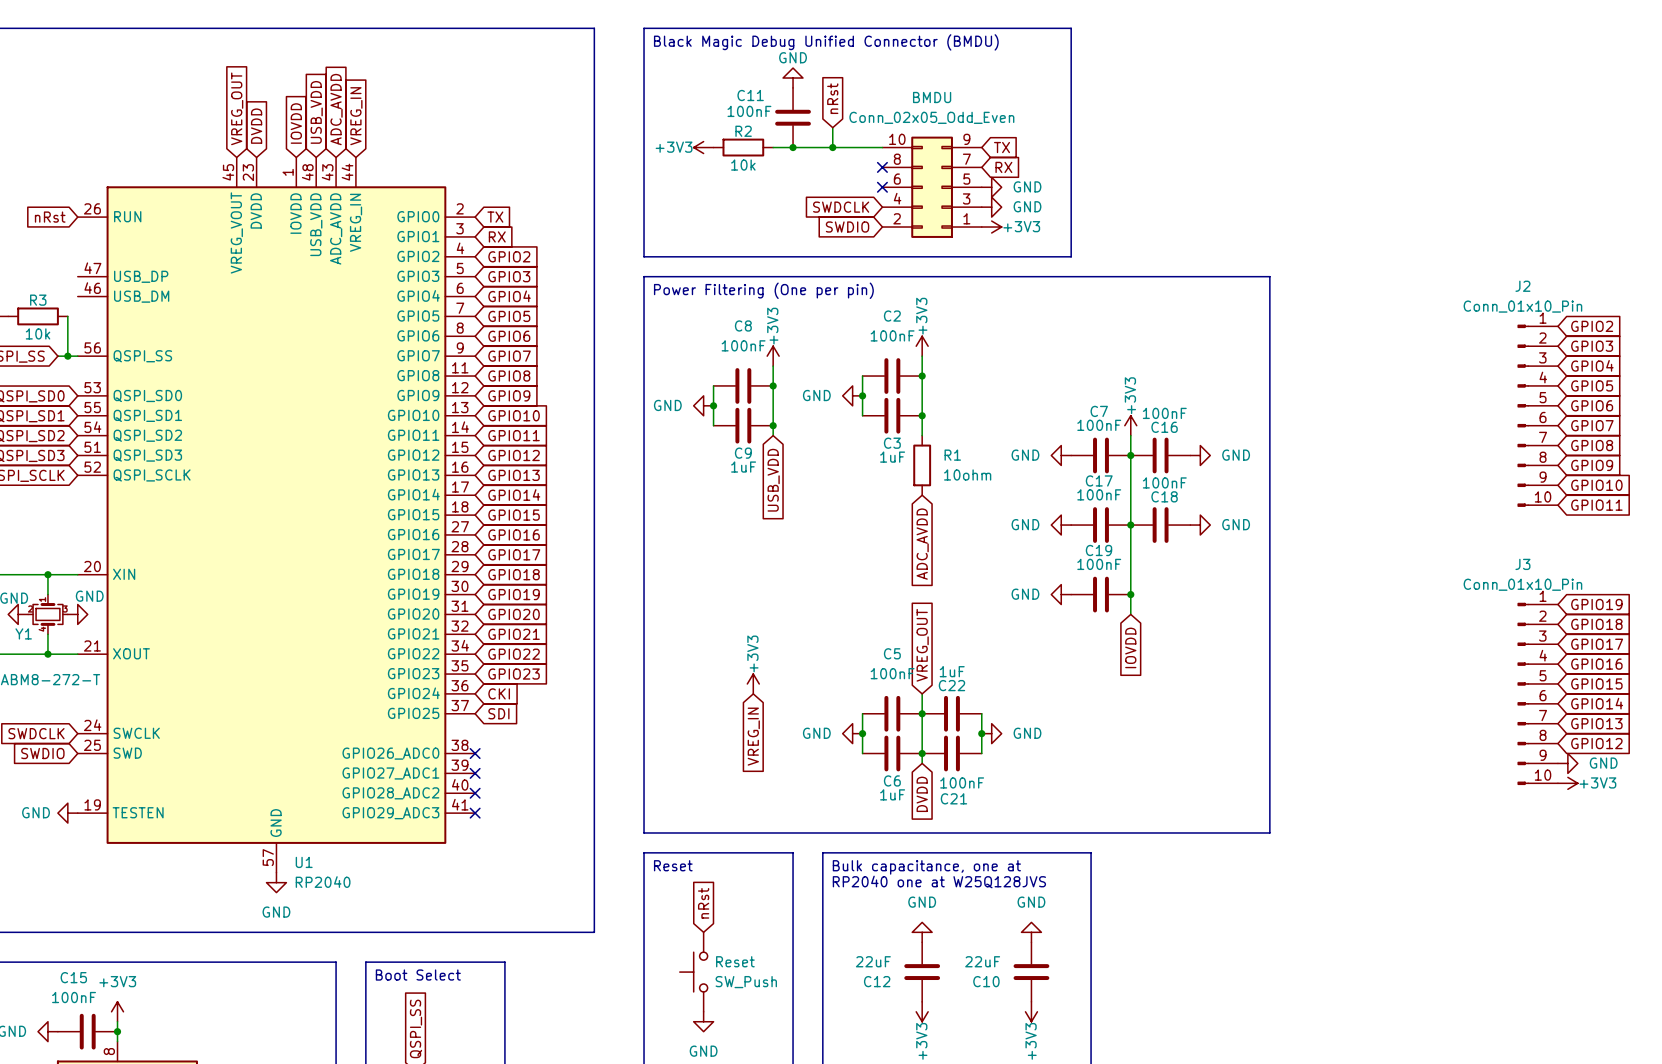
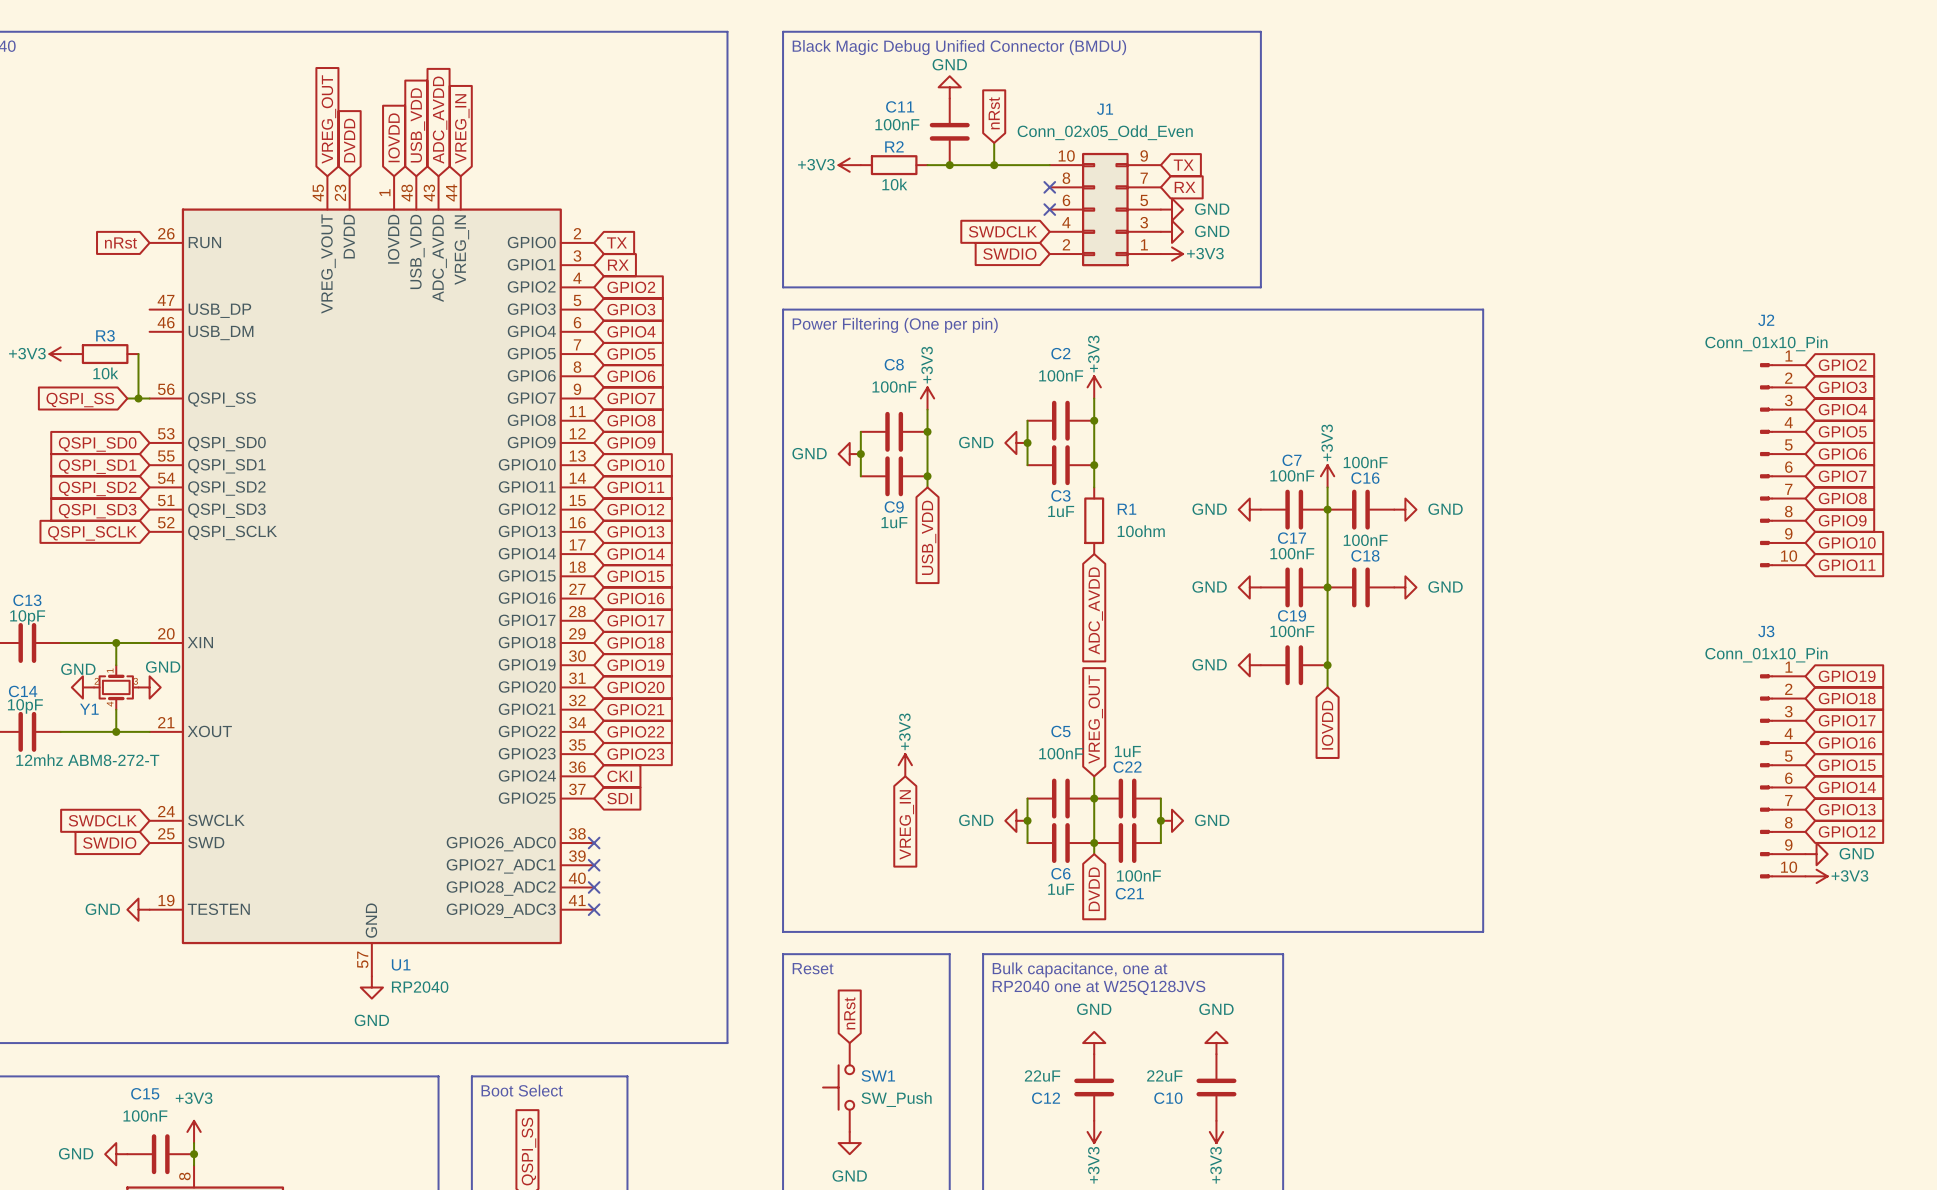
BMDU name: BMDU (932, 97) -> J1 (1105, 109)
Reset name: Reset (735, 961) -> SW1 (878, 1075)

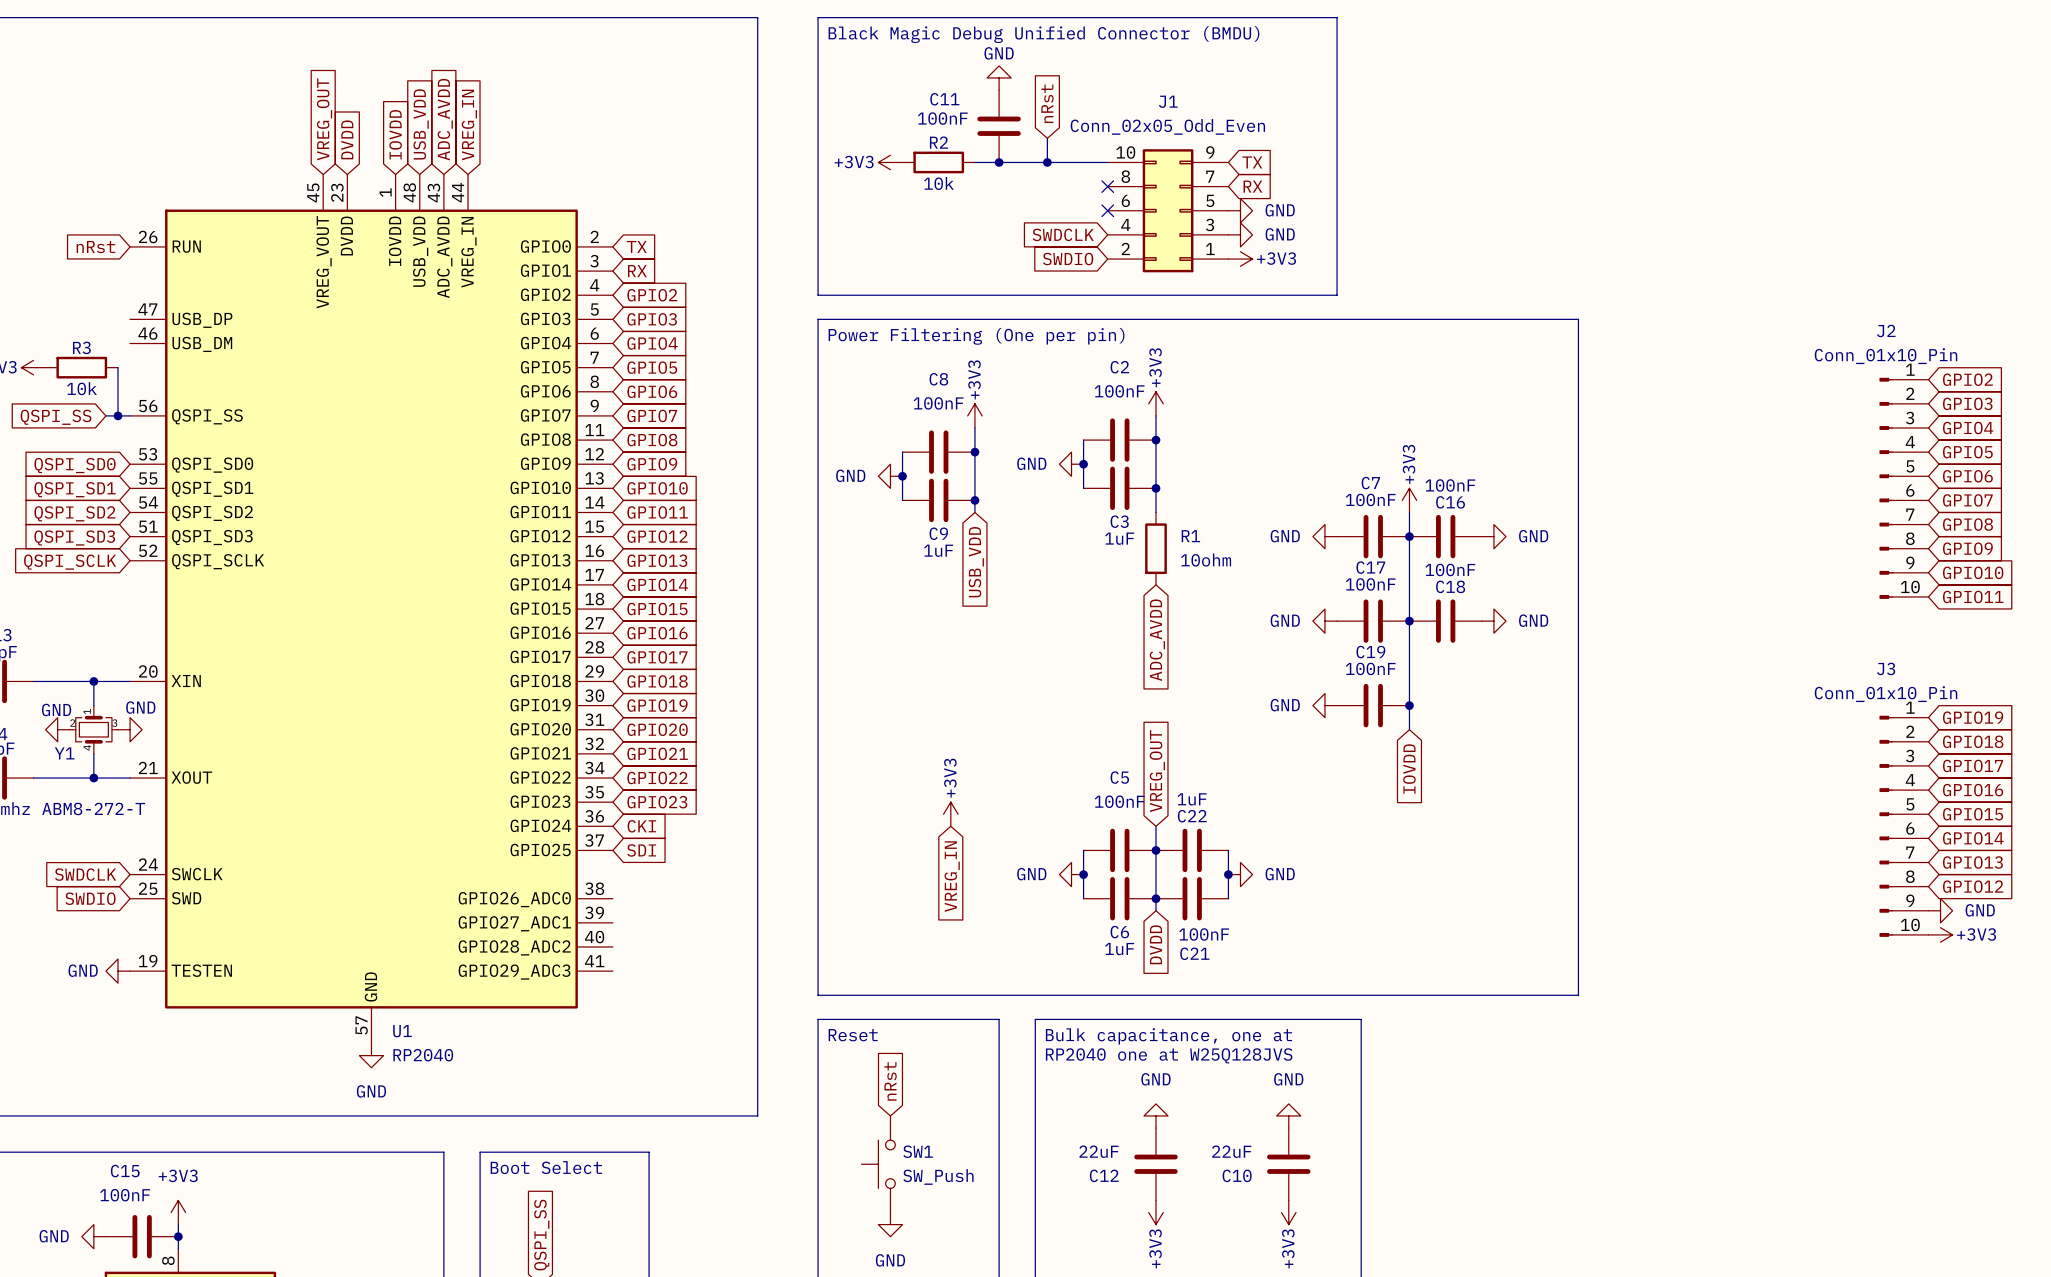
no-connect mark: (594, 843) -> none
no-connect mark: (594, 865) -> none
no-connect mark: (594, 887) -> none
no-connect mark: (594, 909) -> none

